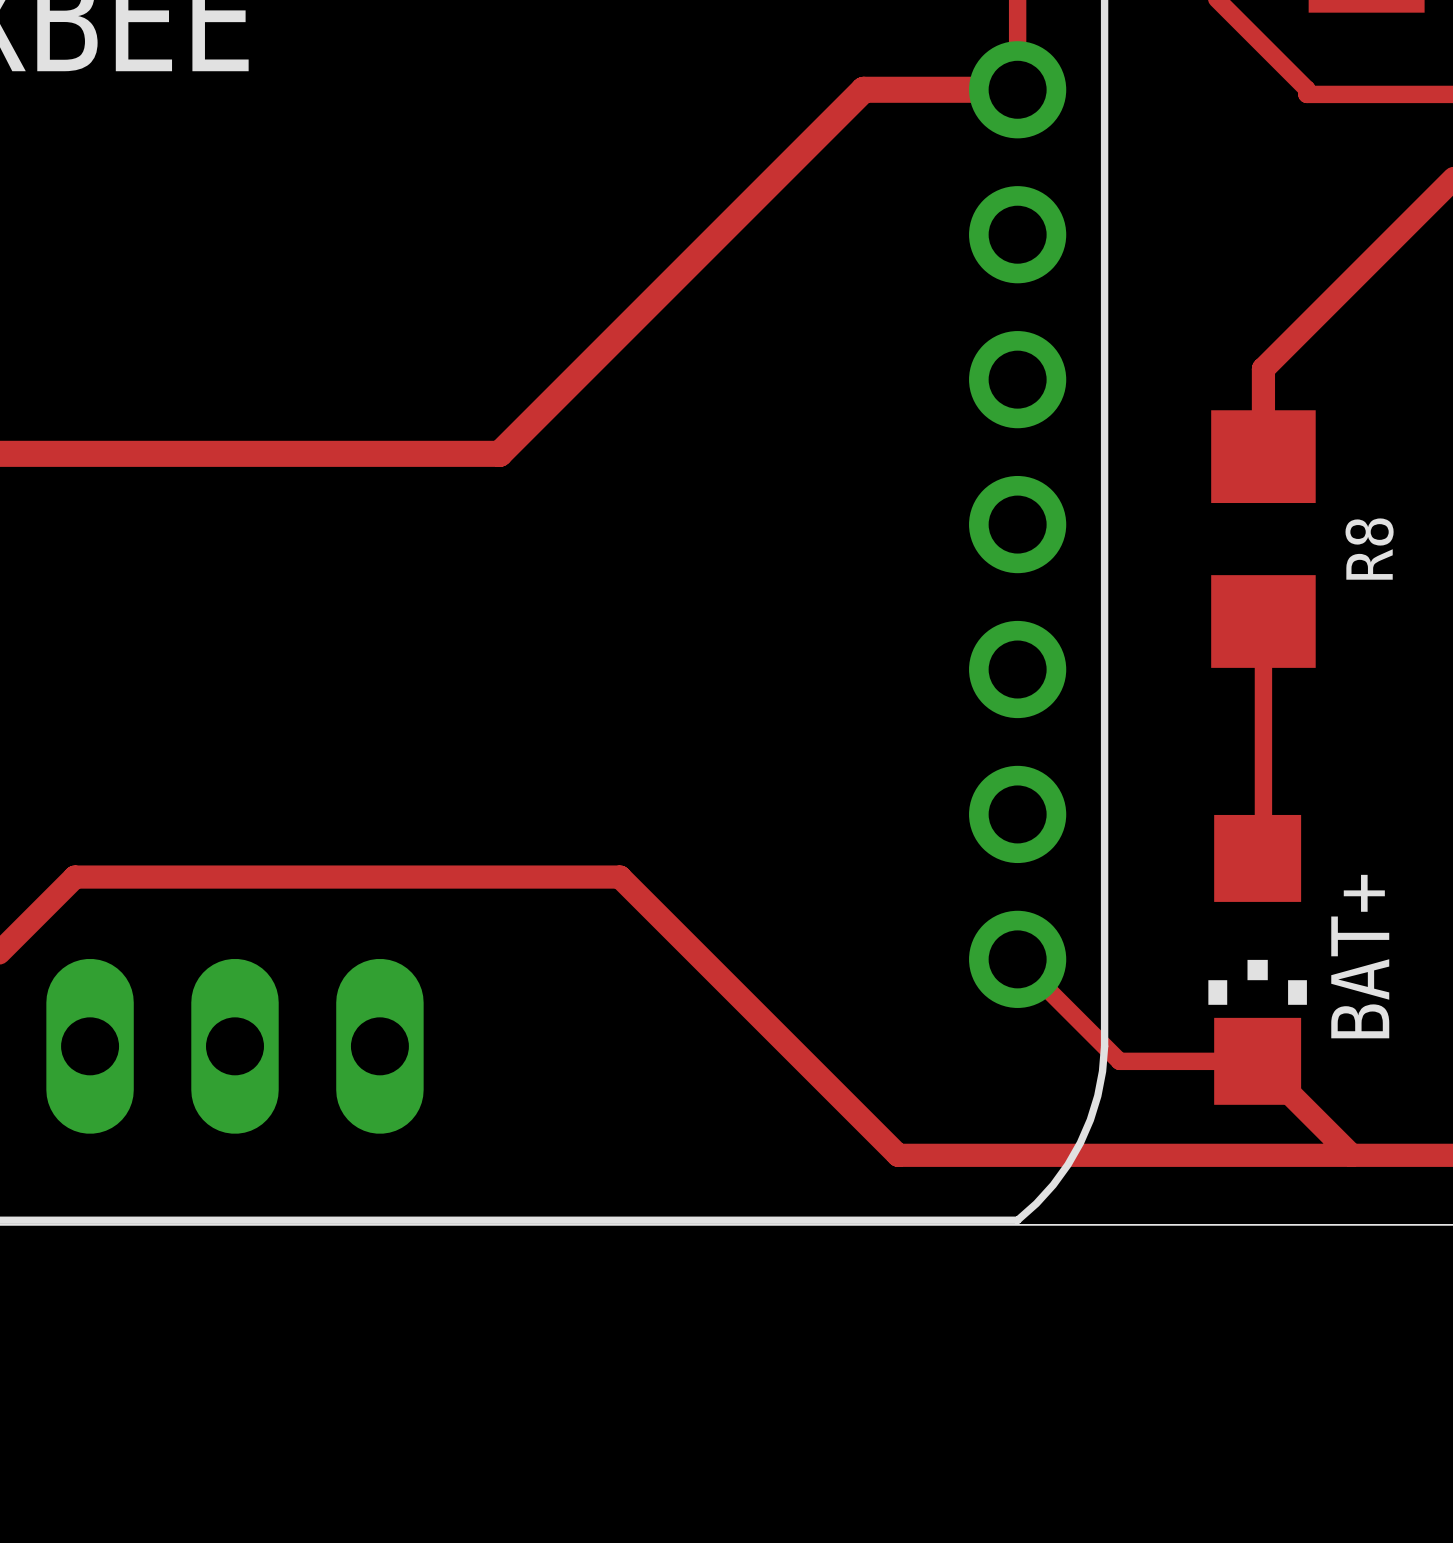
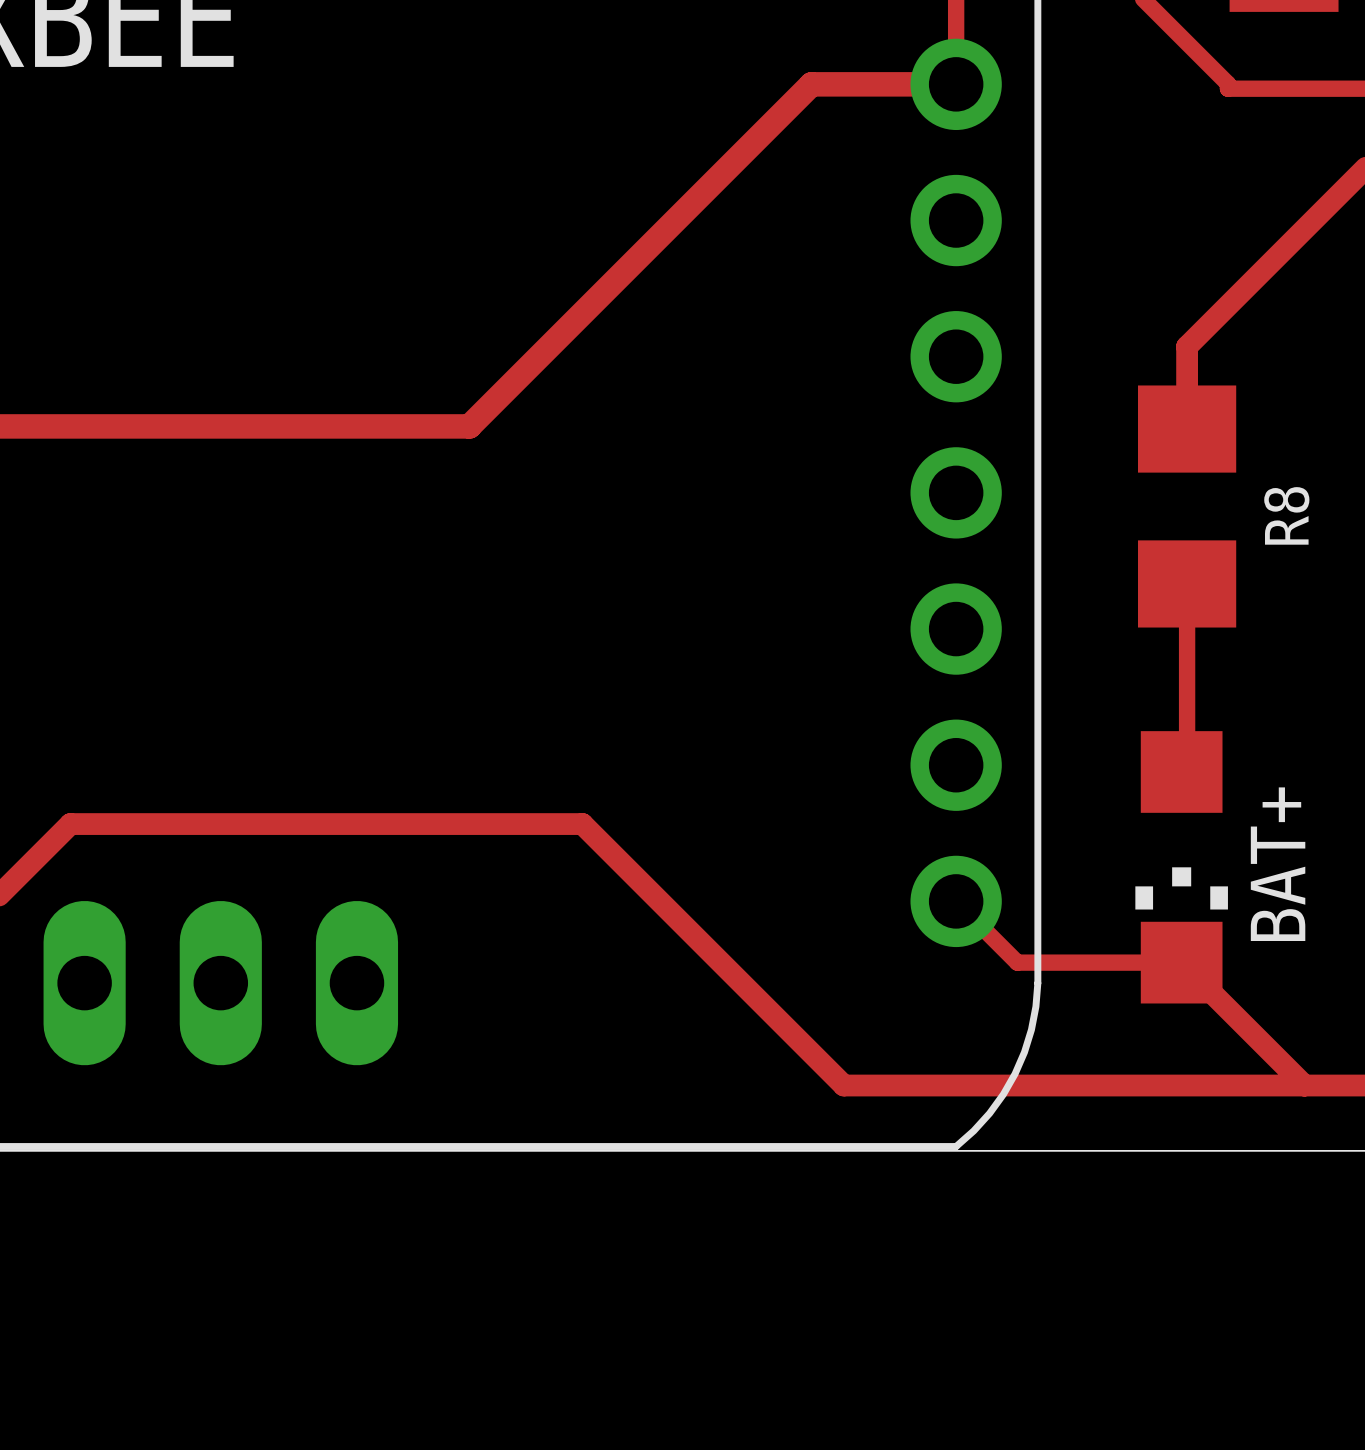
BAT+ position: (1257, 959) -> (1181, 867)
track: (1082, 1024) (1119, 1061) (1257, 1061) (1351, 1155) -> (1017, 962) (1181, 962) (1304, 1085)

